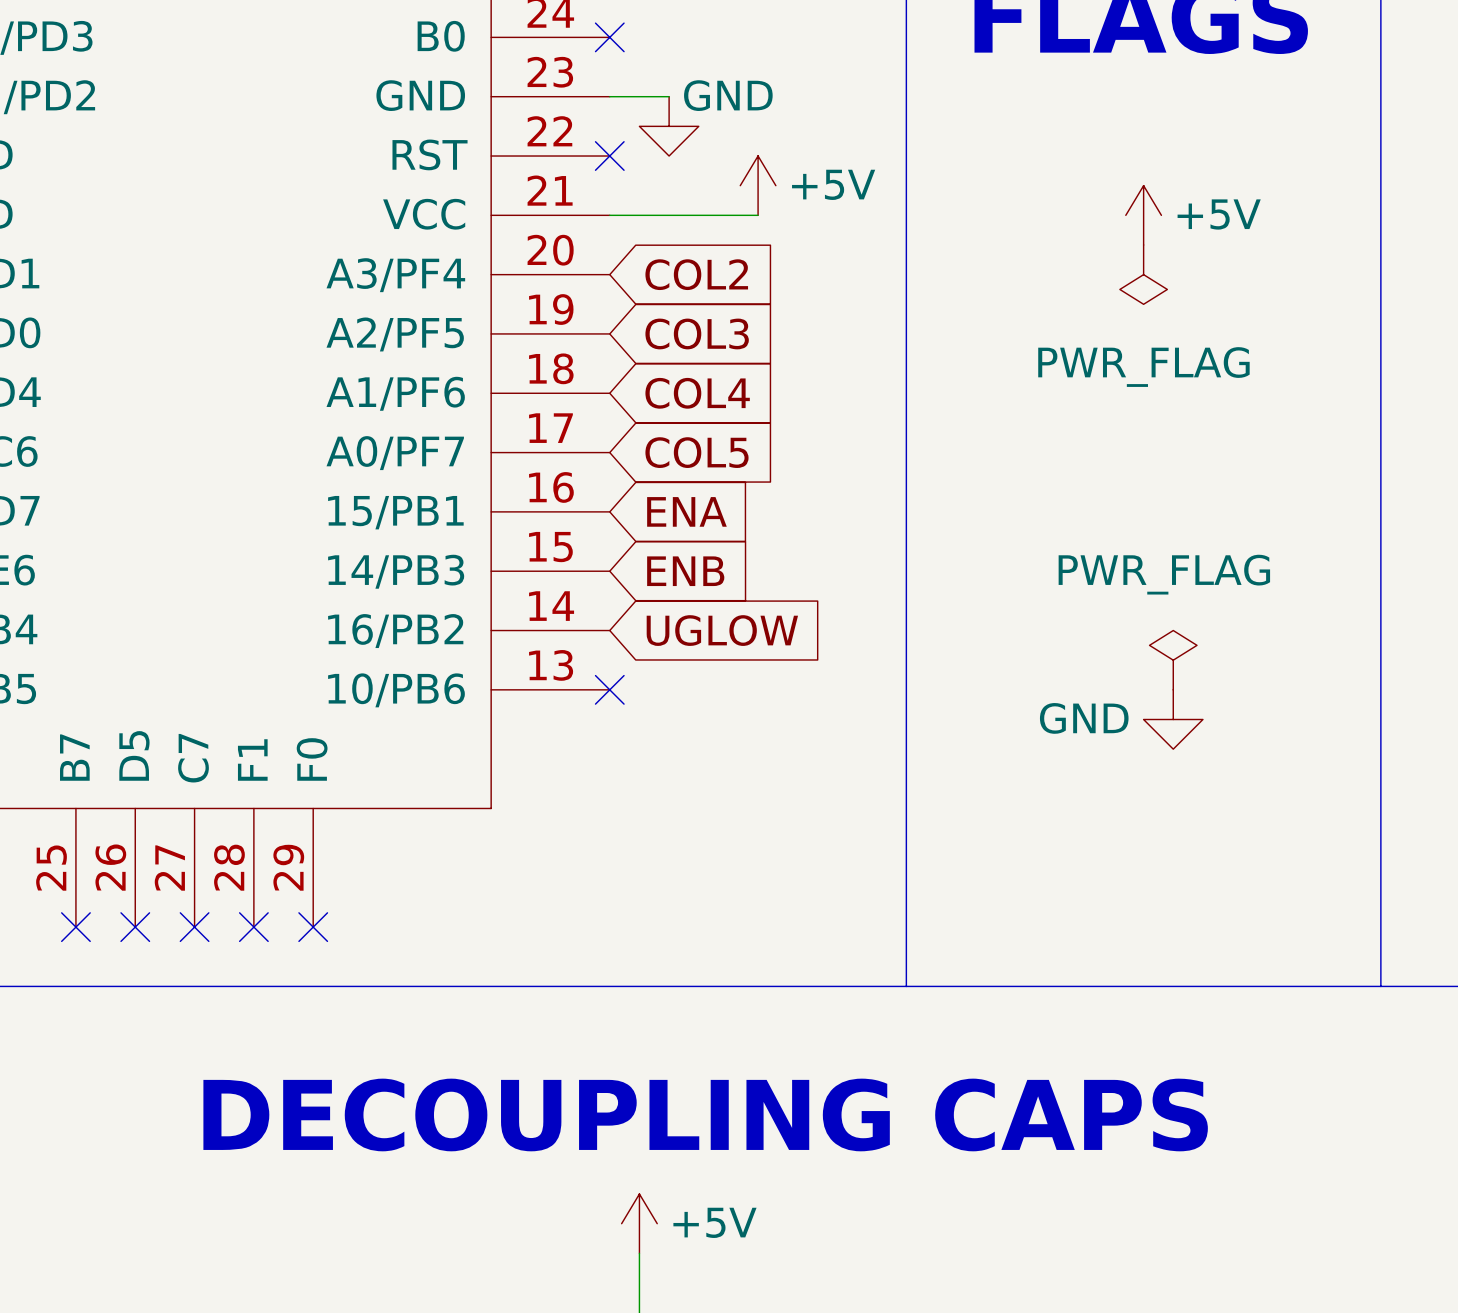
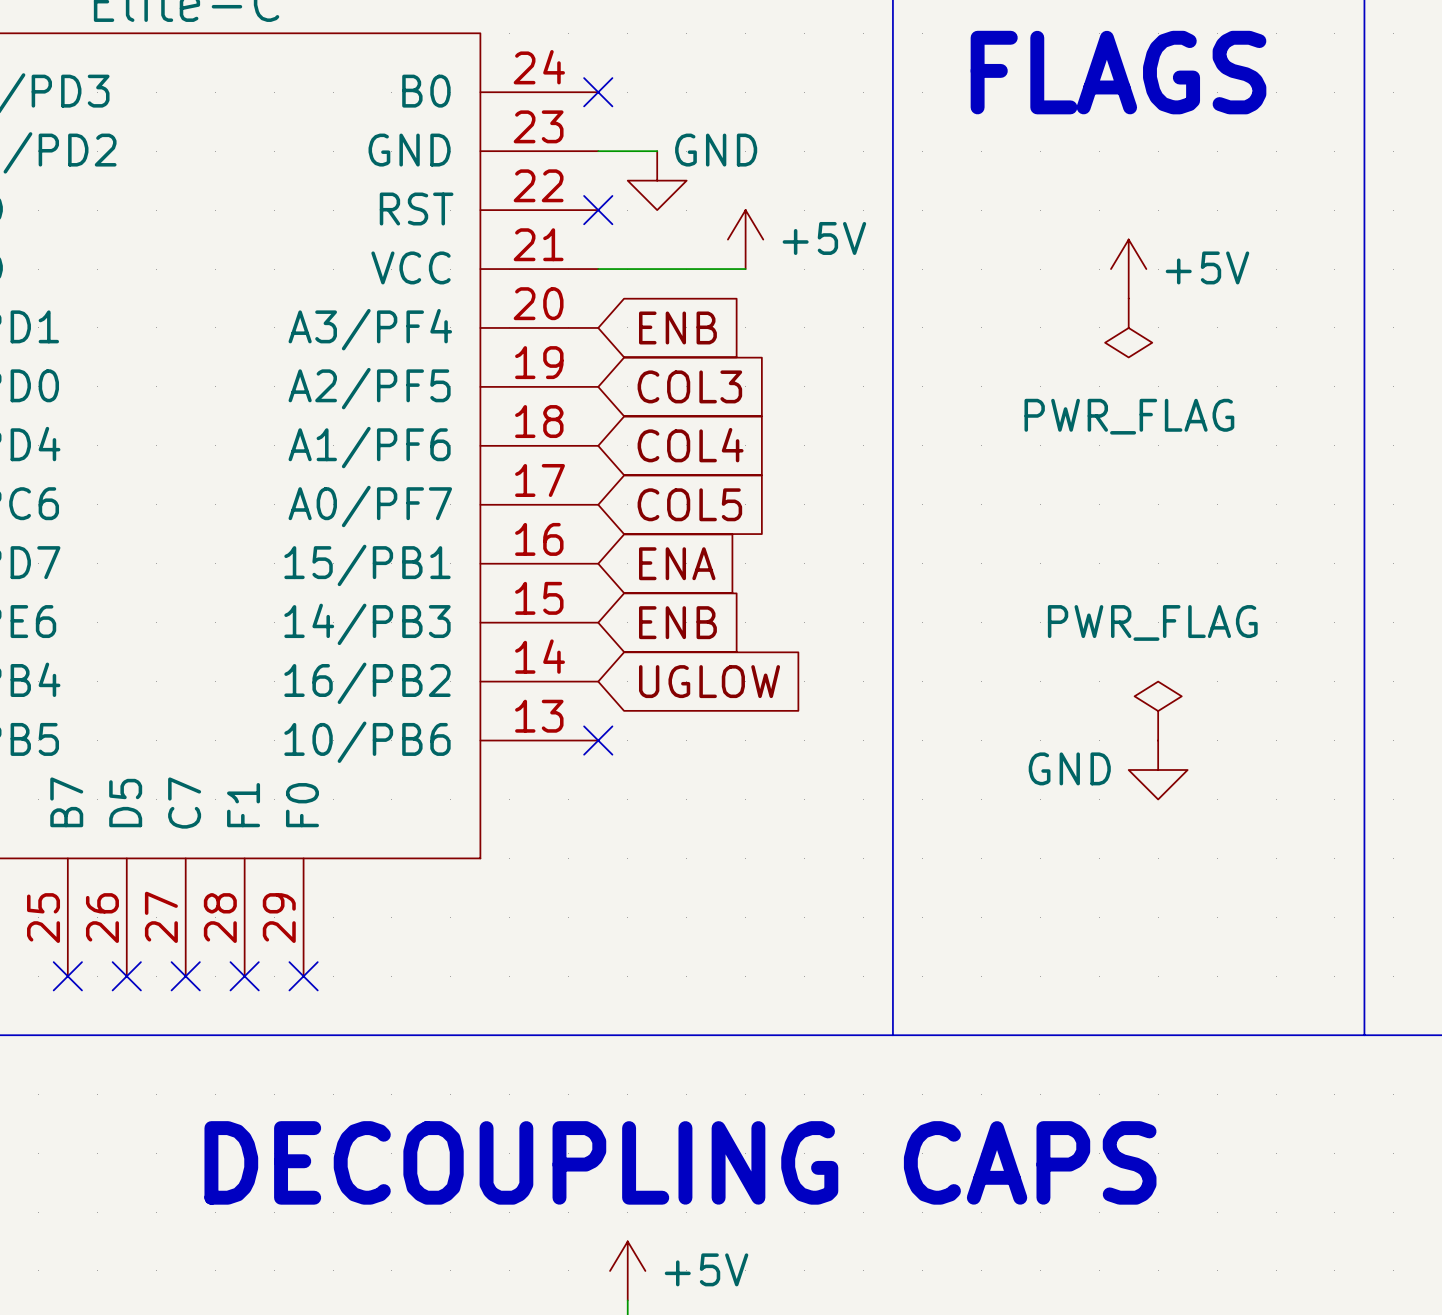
global label: COL2 (696, 274) -> ENB (677, 327)

